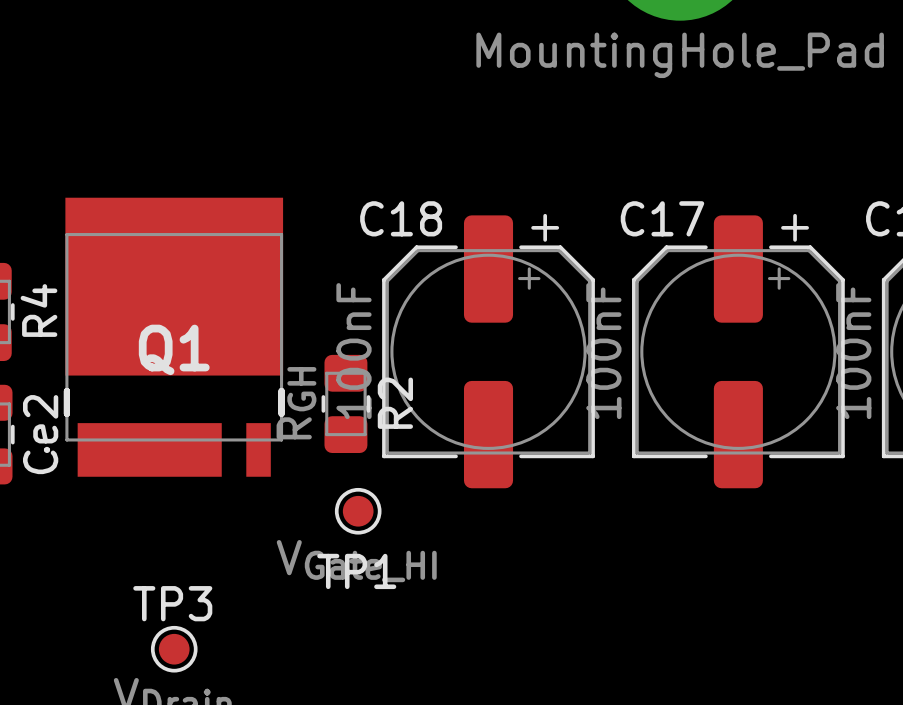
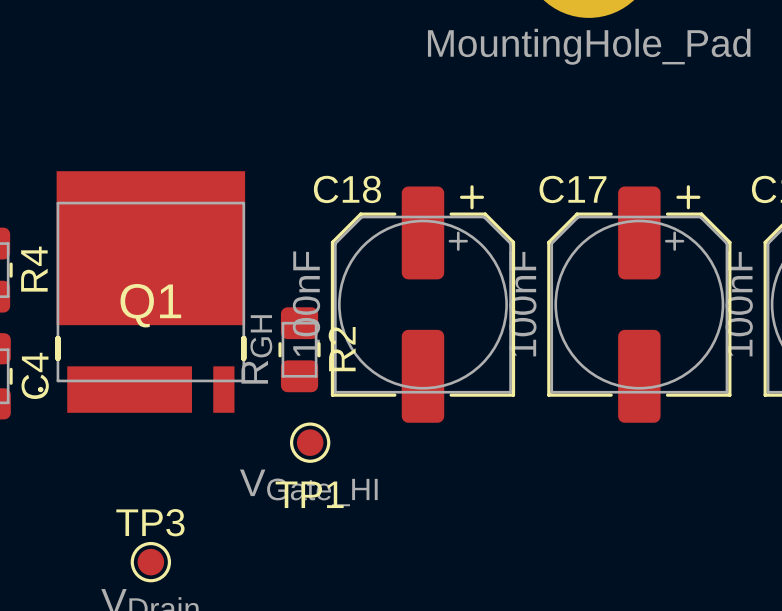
Ce2 name: Ce2 (40, 434) -> C4 (35, 375)

